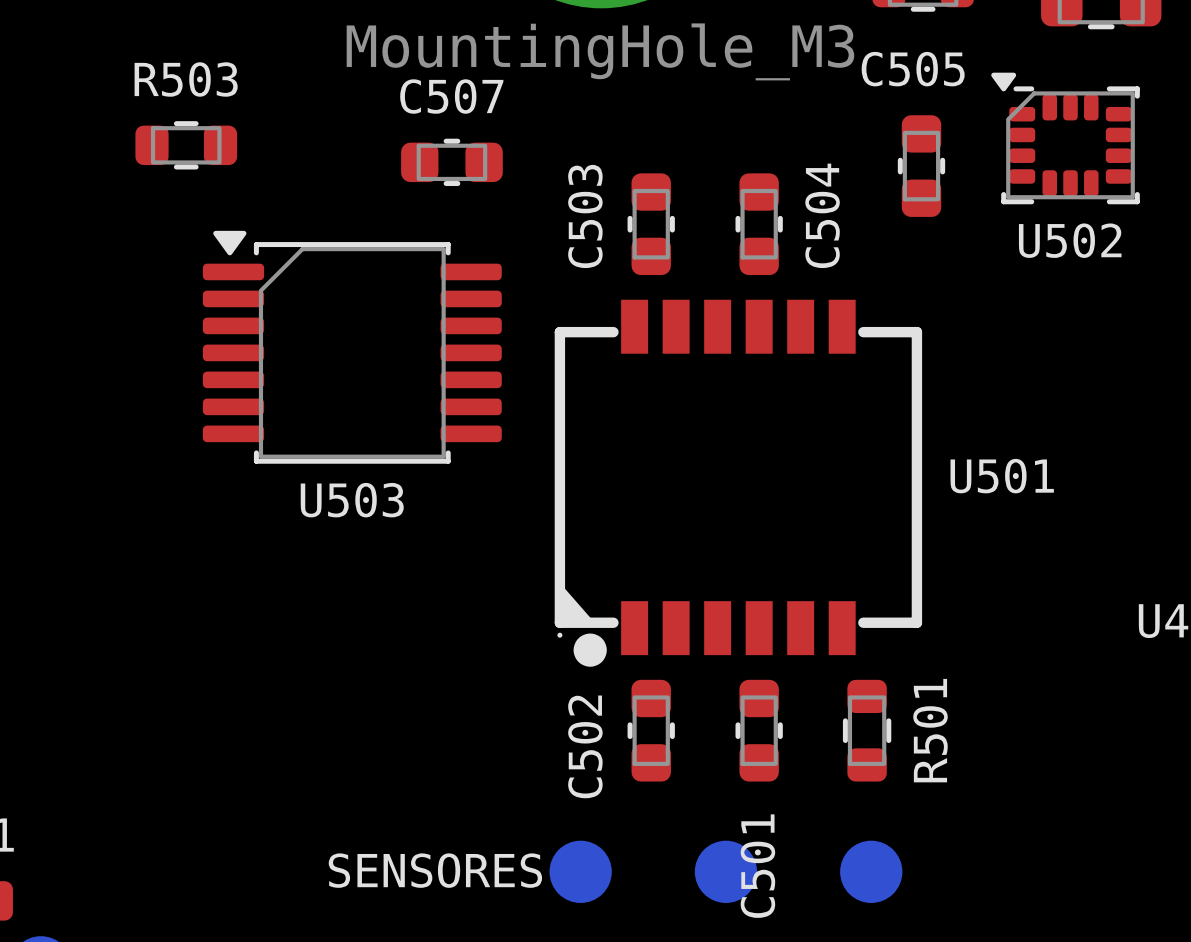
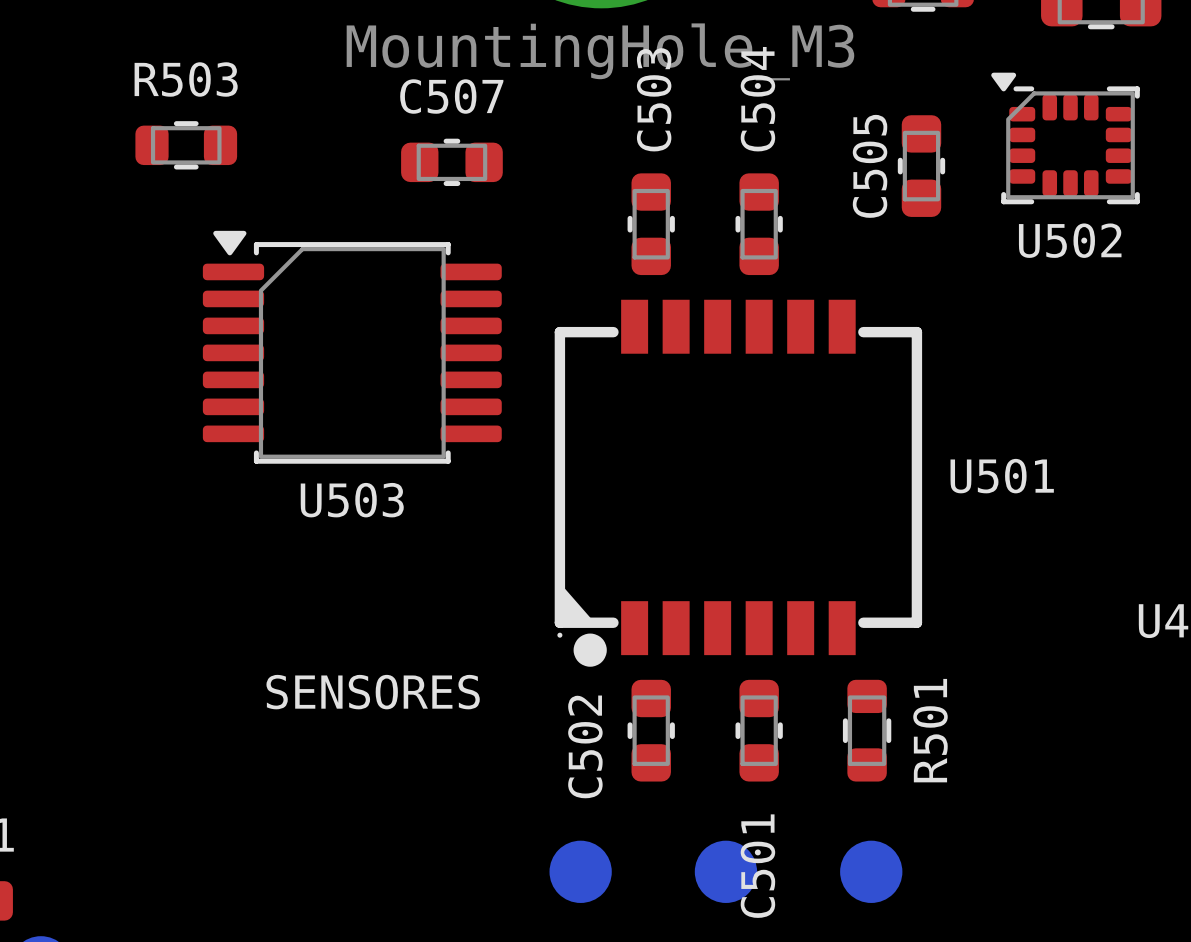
C505 name rotation: 0° (913, 69) -> 90° counterclockwise (870, 166)
C504 name position: C504 (822, 215) -> C504 (757, 99)
C503 name position: C503 (585, 216) -> C503 (654, 99)
text position: SENSORES (435, 870) -> SENSORES (373, 692)

